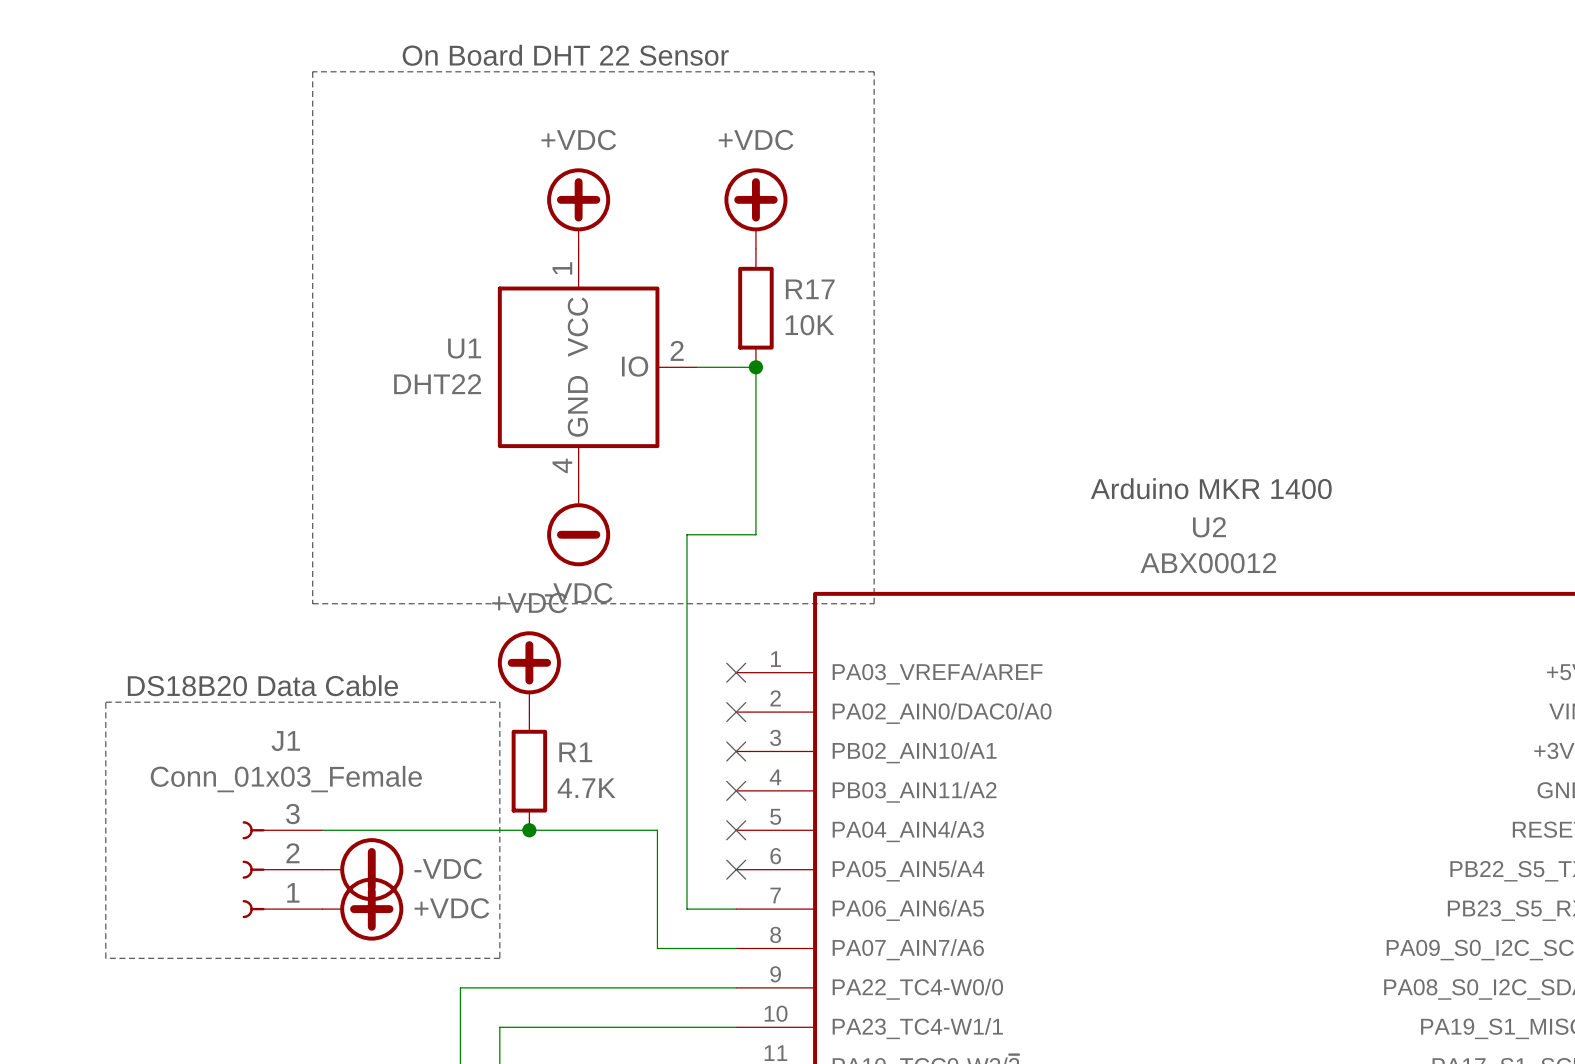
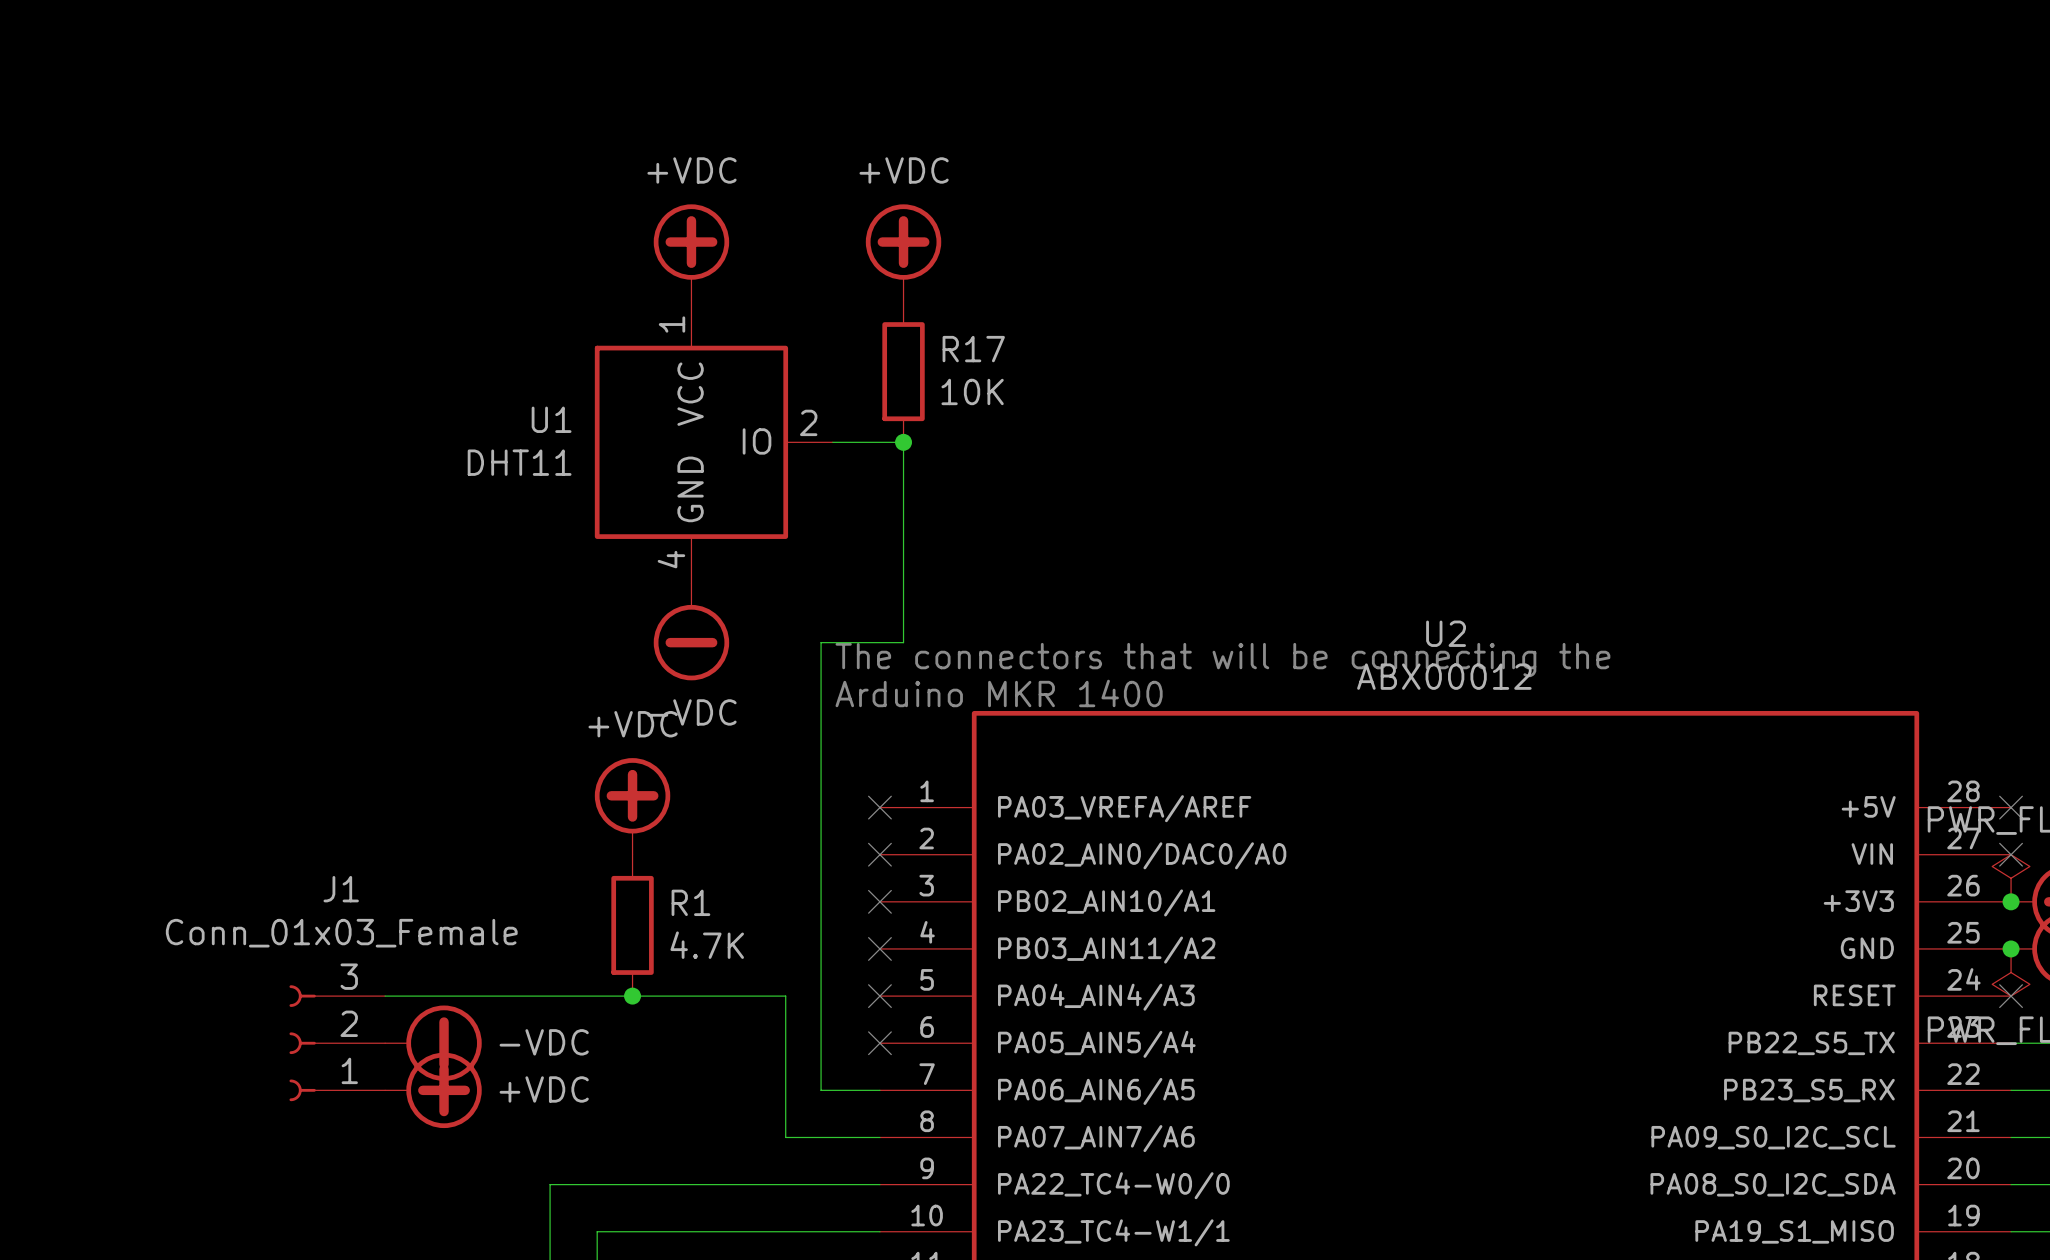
text: On Board DHT 22 Sensor (565, 55) -> none
line: (312, 71) (312, 603) (874, 603) (874, 71) (312, 71) -> none
U1 value: DHT22 (437, 384) -> DHT11 (519, 462)
text: Arduino MKR 1400 (1211, 488) -> none
text: none -> The connectors that will be connecting the (1222, 660)
text: none -> Arduino MKR 1400 (999, 693)
text: DS18B20 Data Cable (262, 685) -> none
line: (105, 702) (499, 702) (499, 958) (105, 958) (105, 702) -> none

